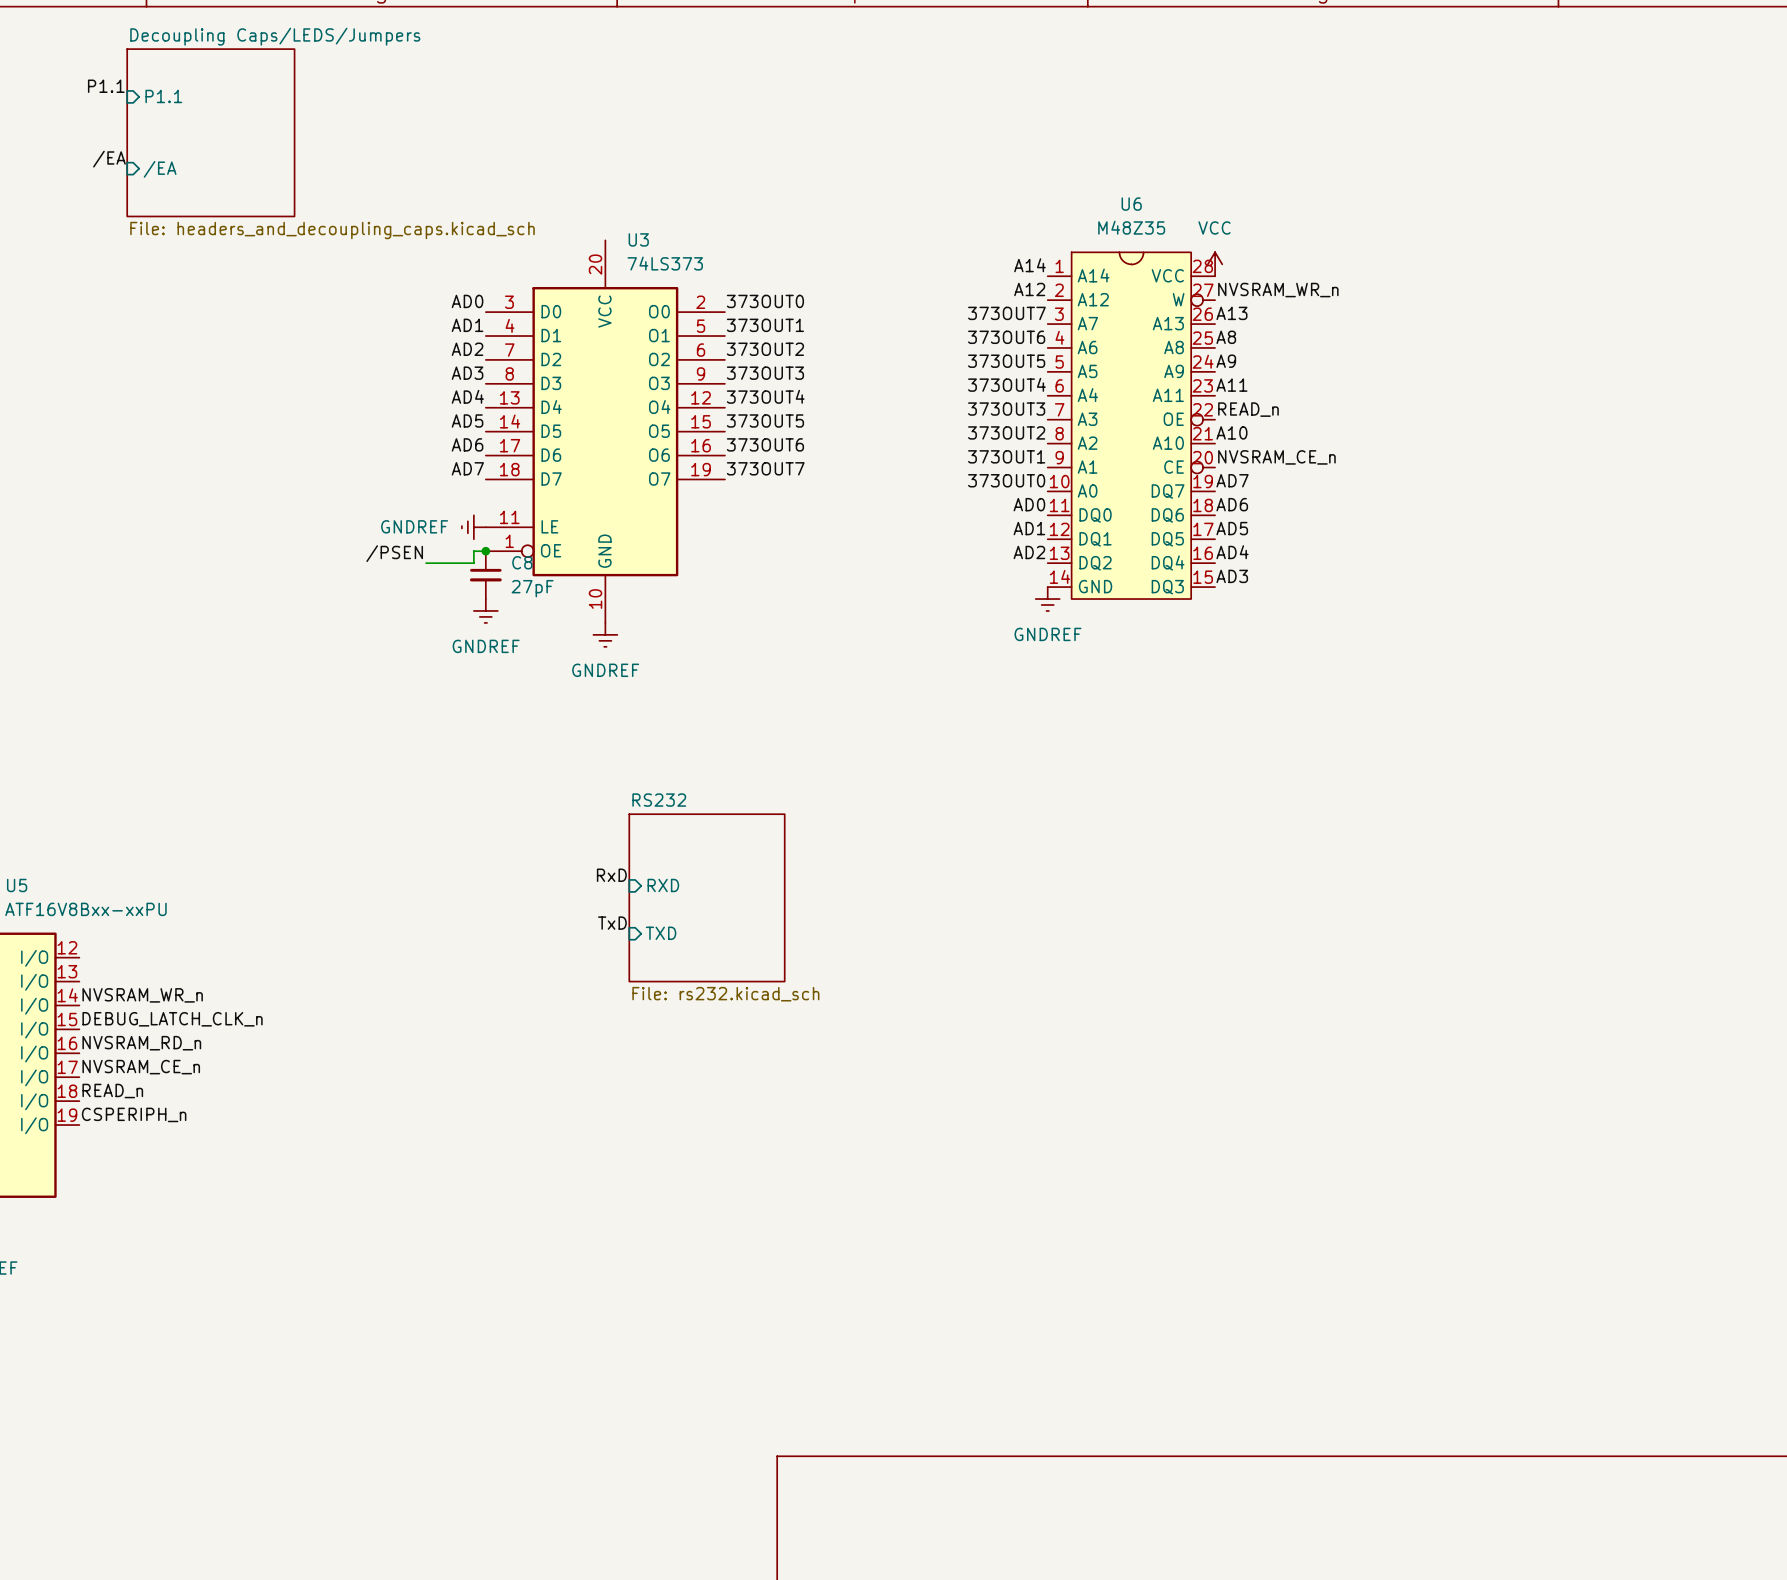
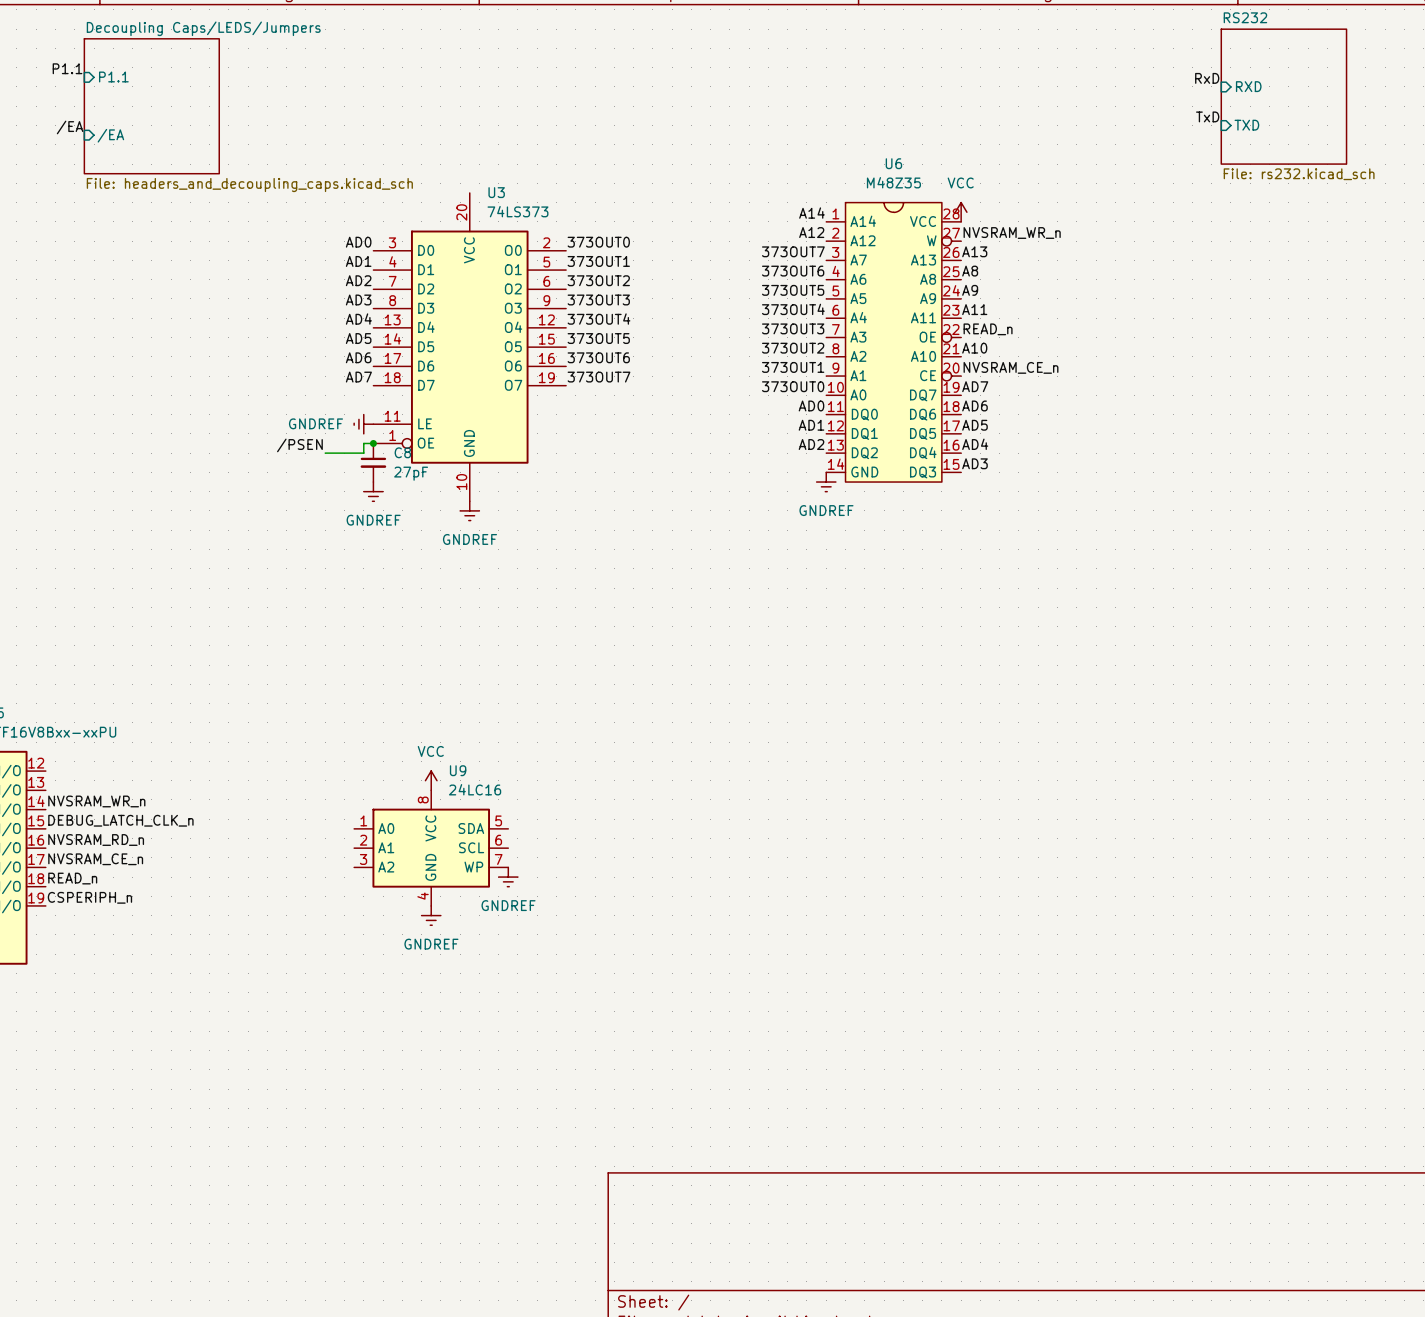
label: none -> RxD (1207, 78)
sheet pin: none -> RXD (1248, 86)
label: none -> TxD (1207, 116)
sheet pin: none -> TXD (1246, 125)
label: RxD (611, 875) -> none
sheet pin: RXD (663, 885) -> none
sheet RS232 position: (707, 897) -> (1283, 96)
label: TxD (612, 923) -> none
sheet pin: TXD (661, 933) -> none
power symbol: none -> VCC (431, 780)
U9: none -> 24LC16 (431, 848)
power symbol: none -> GNDREF (508, 877)
power symbol: none -> GNDREF (431, 915)

